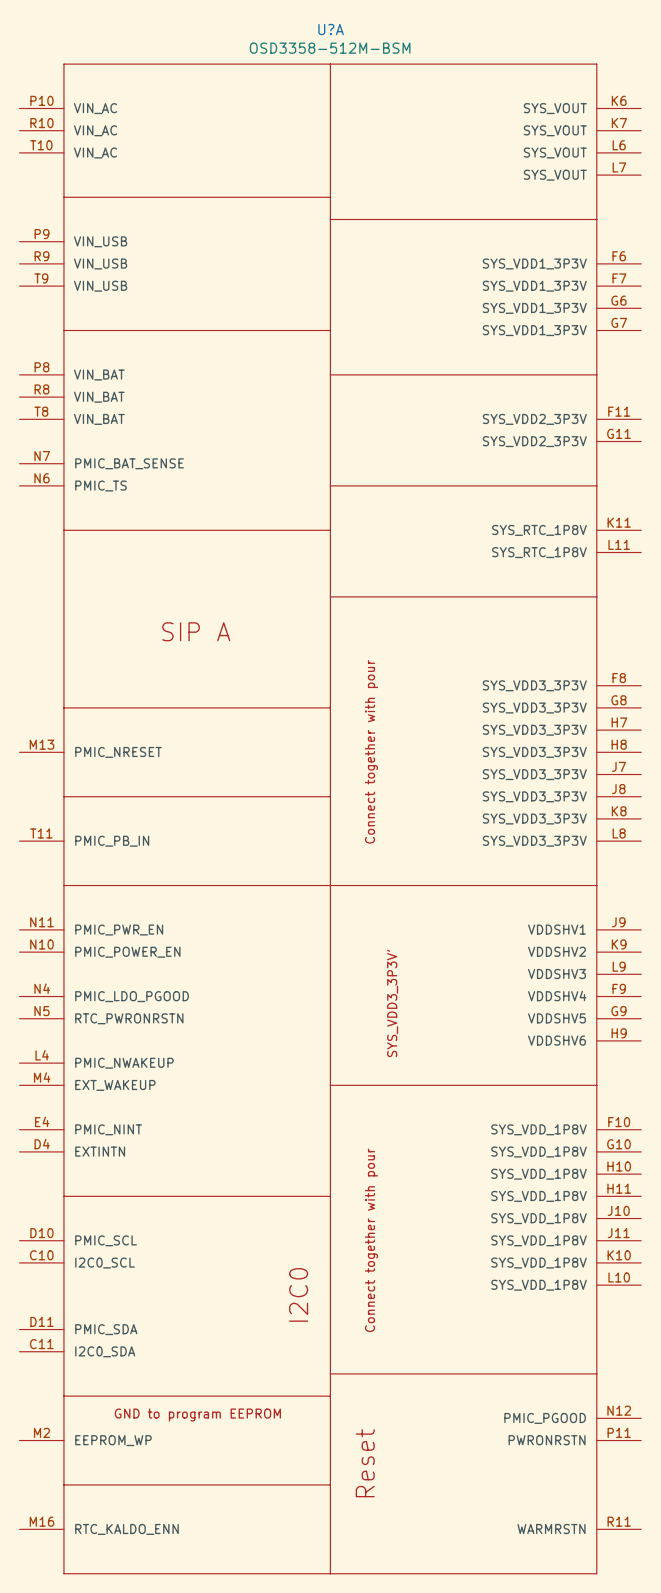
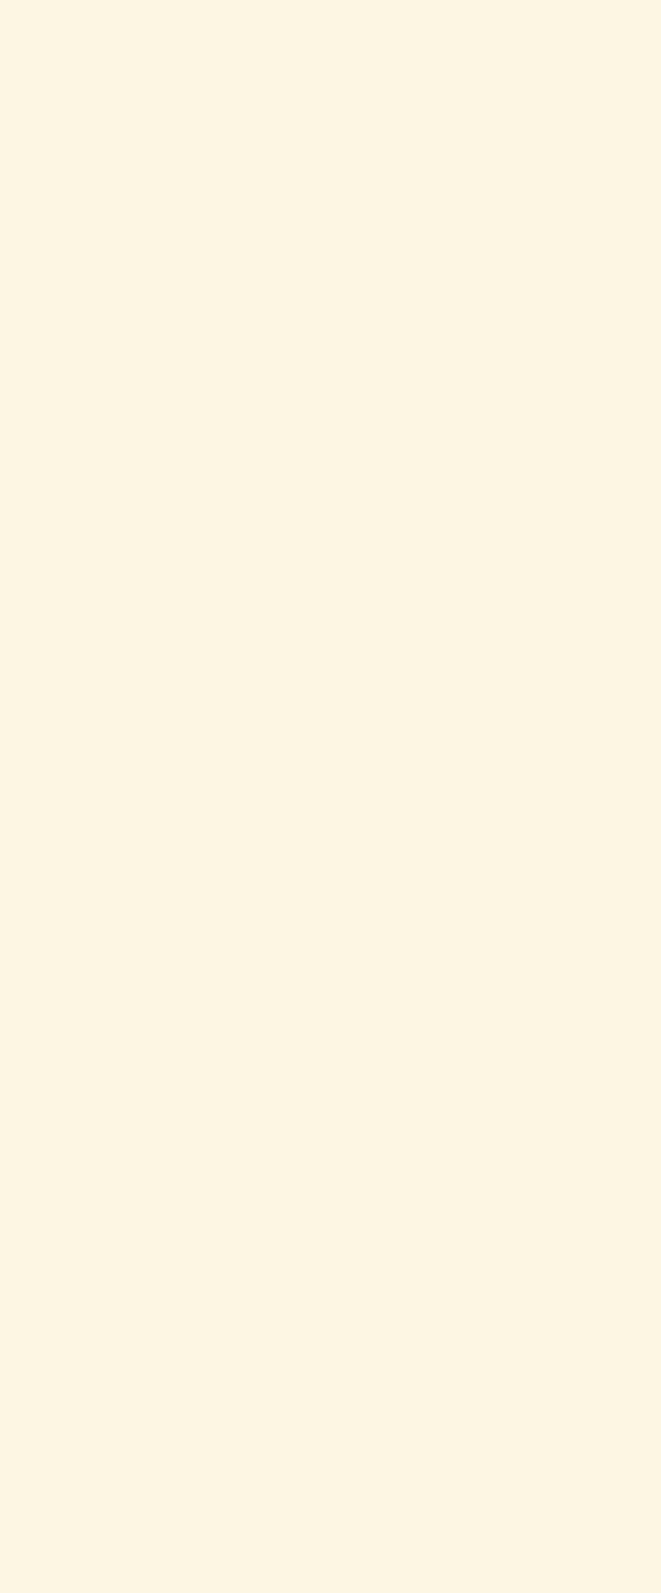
U?A: OSD3358-512M-BSM (330, 818) -> none

